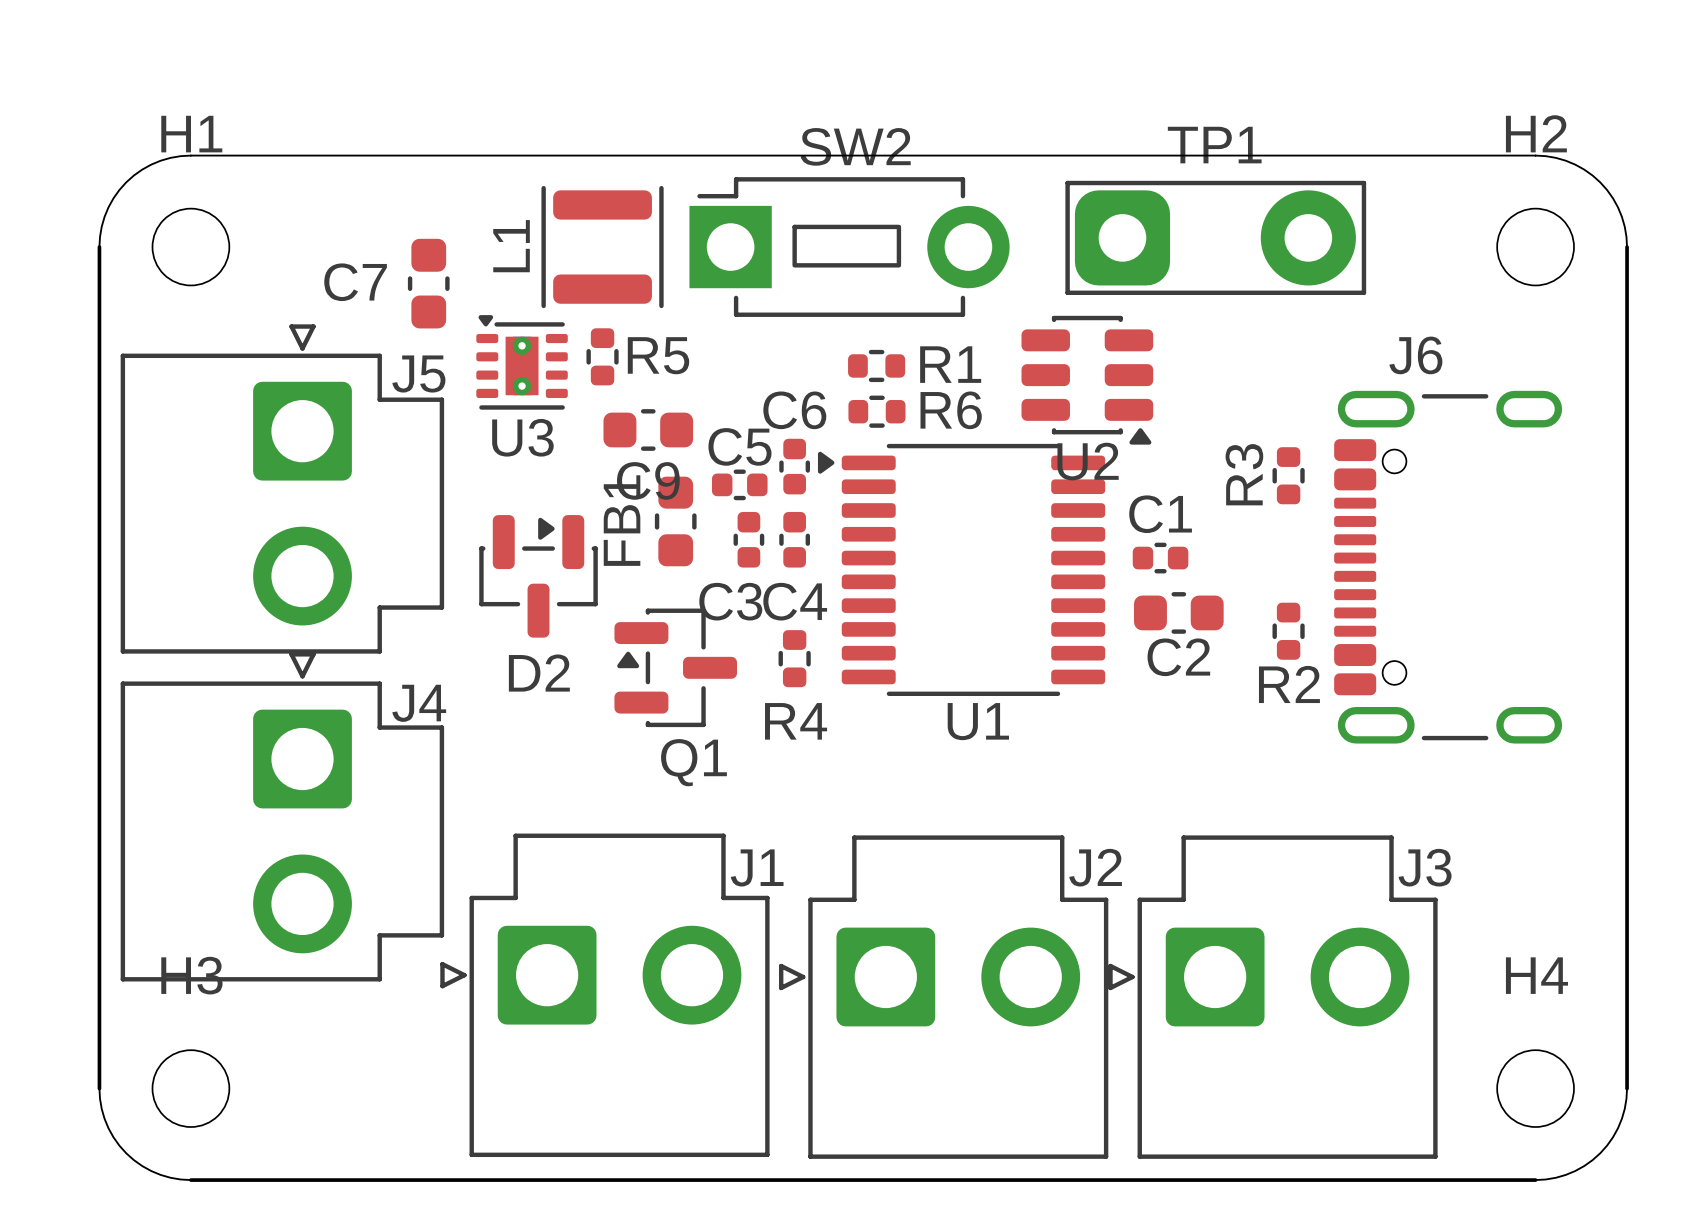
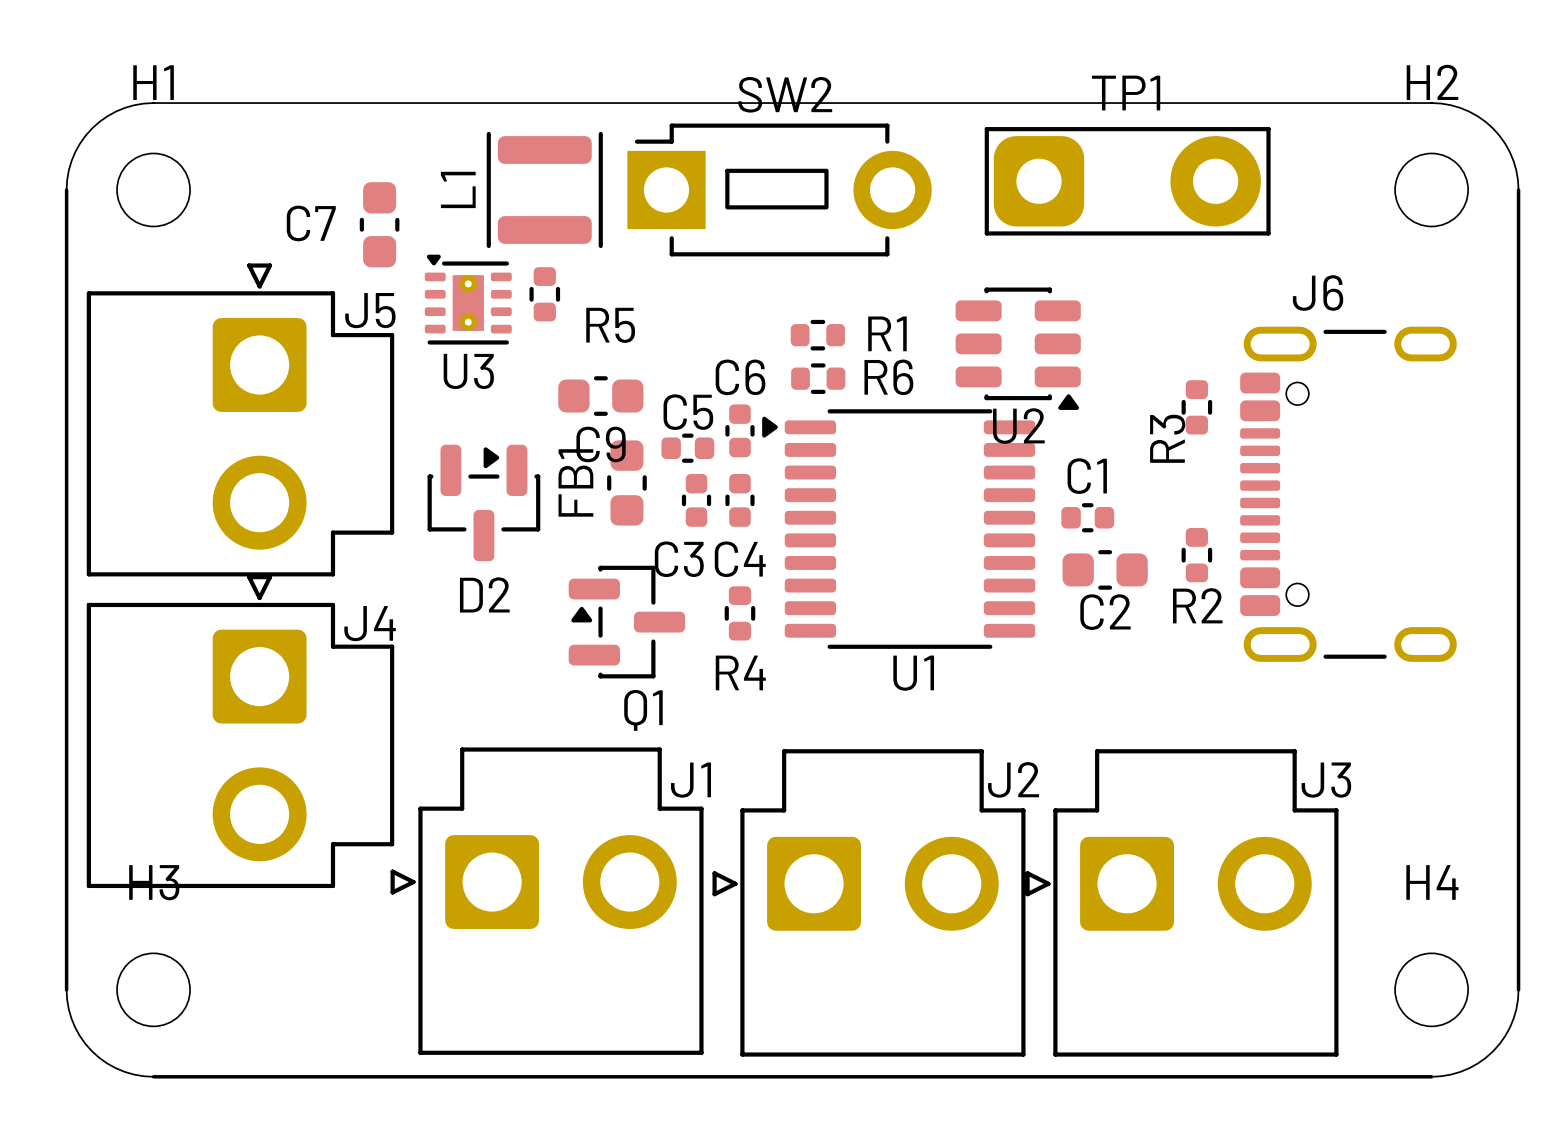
R5 name position: R5 (658, 355) -> R5 (610, 325)
R1 position: (876, 365) -> (817, 335)
U2 position: (1087, 380) -> (1018, 348)
R6 position: (876, 411) -> (818, 378)
C9 position: (648, 429) -> (600, 396)
C6 position: (794, 466) -> (739, 430)
R3 name position: R3 (1244, 474) -> R3 (1167, 438)
C5 position: (739, 484) -> (687, 448)
FB1 position: (675, 521) -> (626, 482)
C3 position: (748, 539) -> (696, 500)
C4 position: (794, 539) -> (739, 500)
C1 position: (1160, 558) -> (1087, 517)
U1 position: (961, 569) -> (898, 529)
C2 position: (1178, 612) -> (1105, 569)
R4 position: (794, 658) -> (739, 613)
Q1 position: (675, 667) -> (626, 622)

